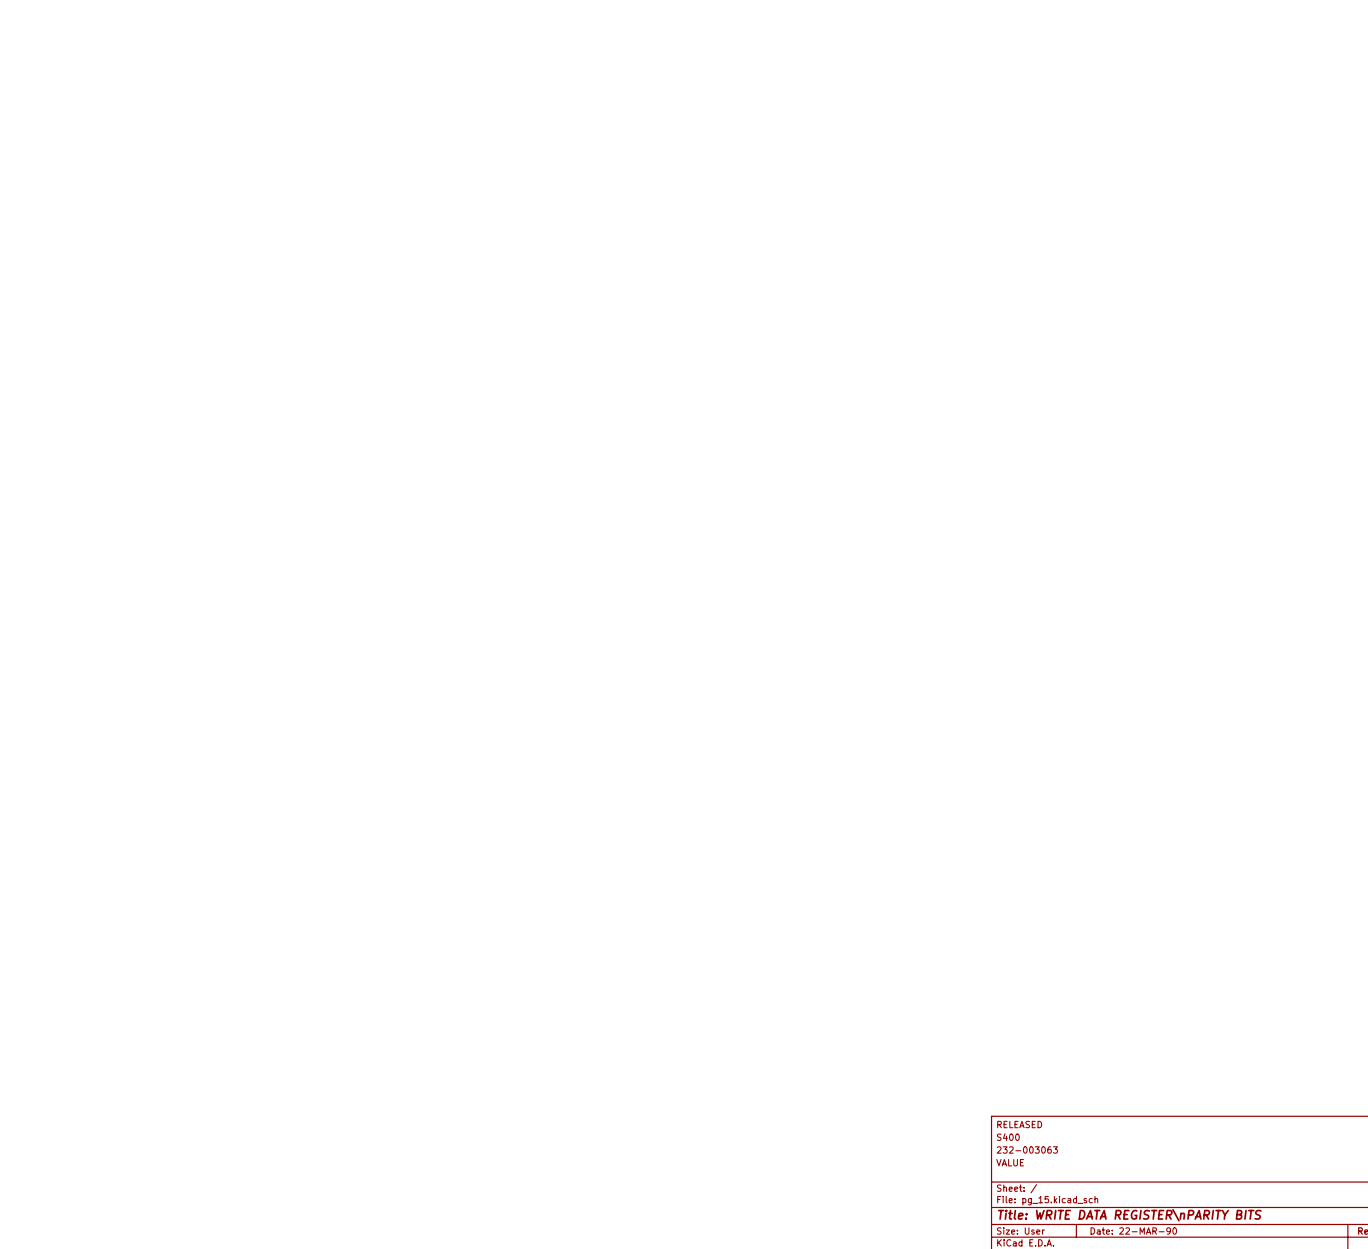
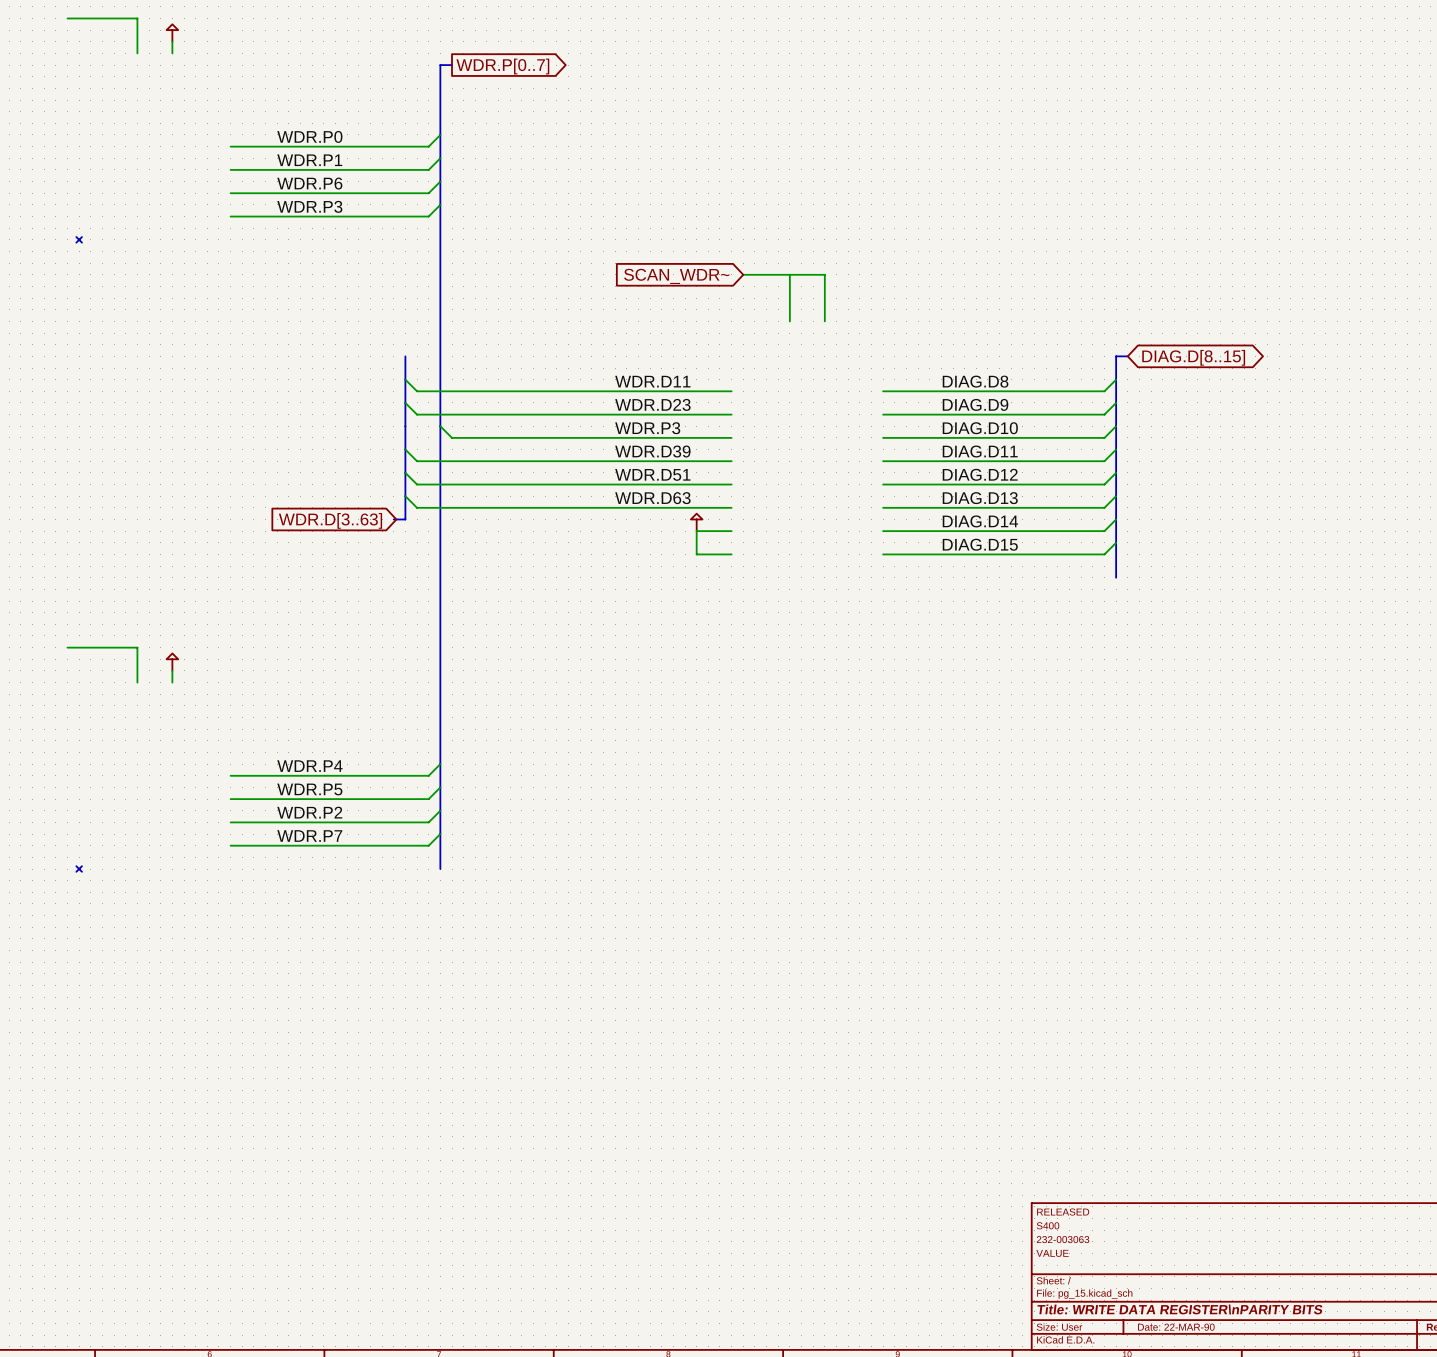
wire: none -> (67, 18) (137, 18) (137, 53)
power symbol: none -> (172, 32)
wire: none -> (172, 41) (172, 53)
bus: none -> (452, 65) (440, 65) (440, 869)
global label: none -> WDR.P[0..7] (502, 66)
wire: none -> (440, 134) (428, 146) (230, 146)
label: none -> WDR.P0 (309, 136)
wire: none -> (440, 158) (428, 169) (230, 169)
label: none -> WDR.P1 (309, 160)
wire: none -> (440, 181) (428, 193) (230, 193)
label: none -> WDR.P6 (309, 183)
wire: none -> (440, 204) (428, 216) (230, 216)
label: none -> WDR.P3 (309, 206)
no-connect mark: none -> (79, 239)
wire: none -> (743, 274) (824, 274) (824, 321)
wire: none -> (789, 274) (789, 321)
global label: none -> SCAN_WDR~ (676, 276)
bus: none -> (405, 356) (405, 519) (393, 519)
bus: none -> (1127, 356) (1116, 356) (1116, 577)
global label: none -> DIAG.D[8..15] (1193, 357)
wire: none -> (405, 379) (417, 391) (731, 391)
wire: none -> (1116, 379) (1104, 391) (883, 391)
label: none -> WDR.D11 (652, 381)
label: none -> DIAG.D8 (975, 381)
wire: none -> (405, 402) (417, 414) (731, 414)
wire: none -> (1116, 402) (1104, 414) (883, 414)
label: none -> WDR.D23 (652, 404)
label: none -> DIAG.D9 (975, 404)
wire: none -> (440, 426) (452, 437) (731, 437)
wire: none -> (1116, 426) (1104, 437) (883, 437)
label: none -> WDR.P3 (647, 428)
label: none -> DIAG.D10 (980, 428)
wire: none -> (405, 449) (417, 461) (731, 461)
wire: none -> (1116, 449) (1104, 461) (883, 461)
label: none -> WDR.D39 (652, 451)
label: none -> DIAG.D11 (980, 451)
wire: none -> (405, 472) (417, 484) (731, 484)
wire: none -> (1116, 472) (1104, 484) (883, 484)
label: none -> WDR.D51 (652, 474)
label: none -> DIAG.D12 (980, 474)
wire: none -> (405, 496) (417, 507) (731, 507)
wire: none -> (1116, 496) (1104, 507) (883, 507)
label: none -> WDR.D63 (652, 498)
label: none -> DIAG.D13 (980, 498)
wire: none -> (1116, 519) (1104, 531) (883, 531)
global label: none -> WDR.D[3..63] (330, 520)
label: none -> DIAG.D14 (980, 521)
power symbol: none -> (696, 522)
wire: none -> (731, 531) (696, 531) (696, 554) (731, 554)
wire: none -> (1116, 542) (1104, 554) (883, 554)
label: none -> DIAG.D15 (980, 544)
wire: none -> (67, 647) (137, 647) (137, 682)
power symbol: none -> (172, 662)
wire: none -> (172, 670) (172, 682)
wire: none -> (440, 764) (428, 775) (230, 775)
label: none -> WDR.P4 (309, 766)
wire: none -> (440, 787) (428, 799) (230, 799)
label: none -> WDR.P5 (309, 789)
wire: none -> (440, 810) (428, 822) (230, 822)
label: none -> WDR.P2 (309, 812)
wire: none -> (440, 834) (428, 845) (230, 845)
label: none -> WDR.P7 (309, 836)
no-connect mark: none -> (79, 869)

